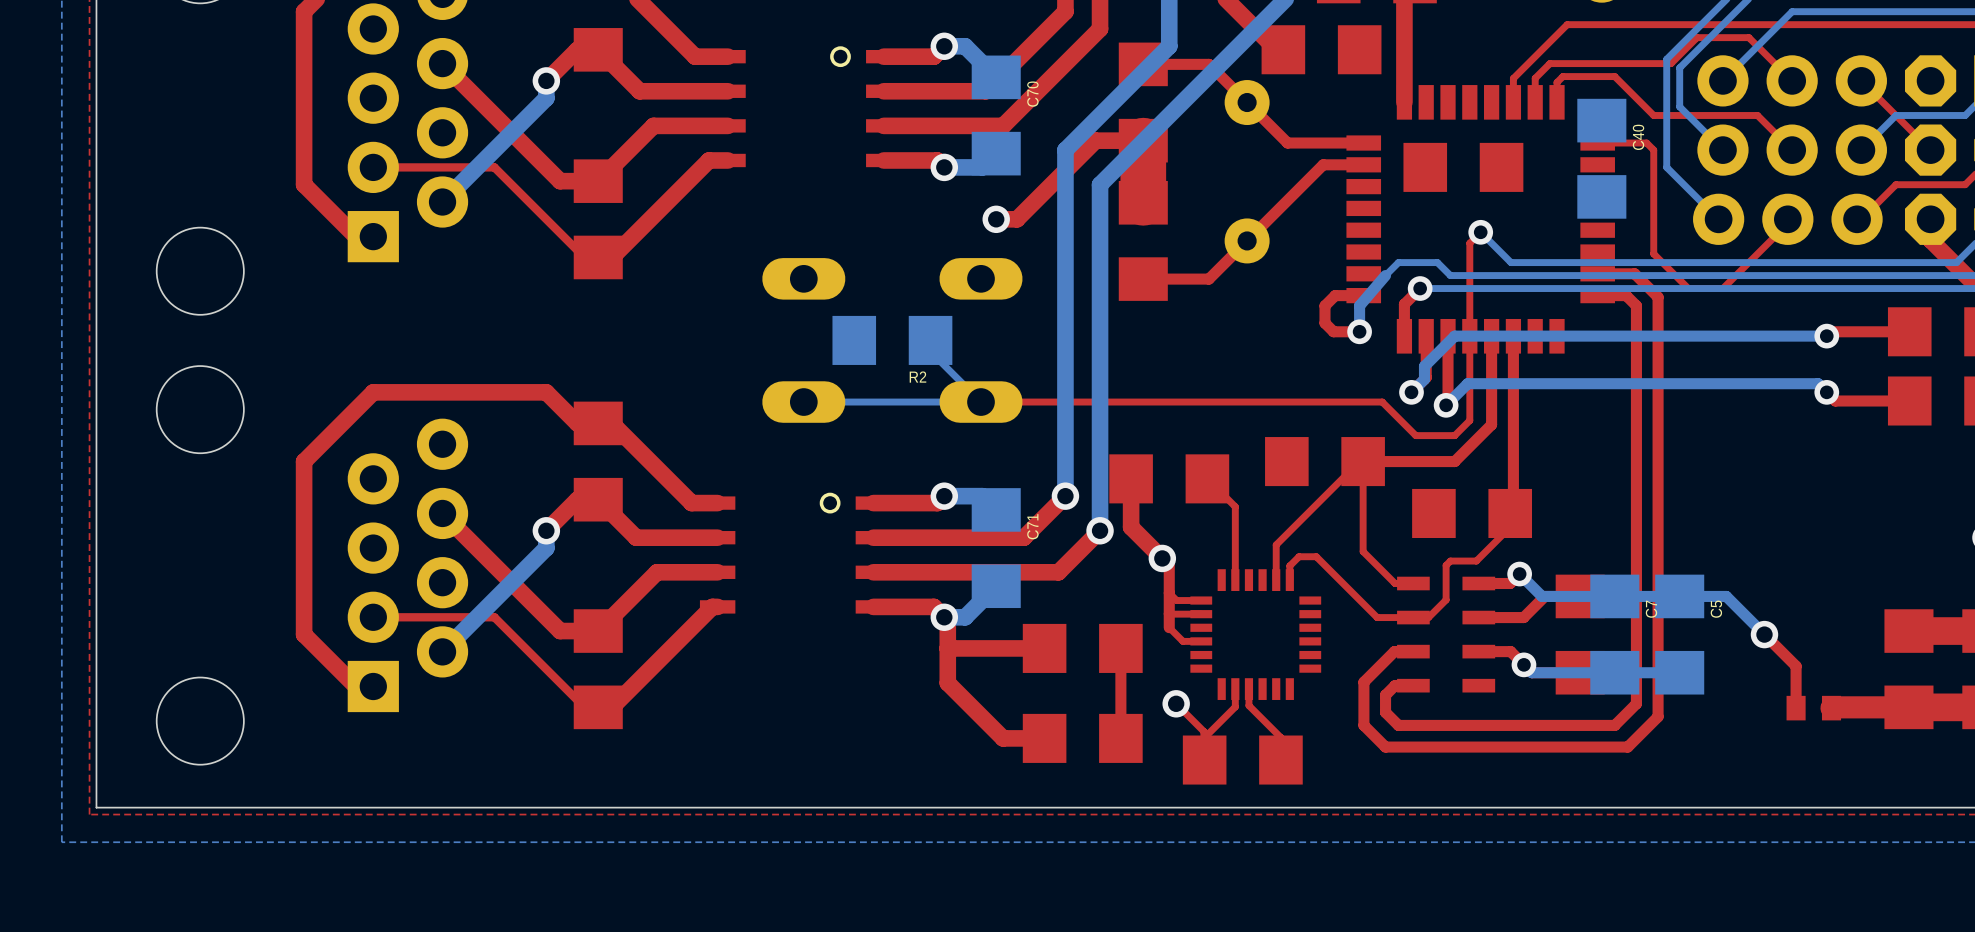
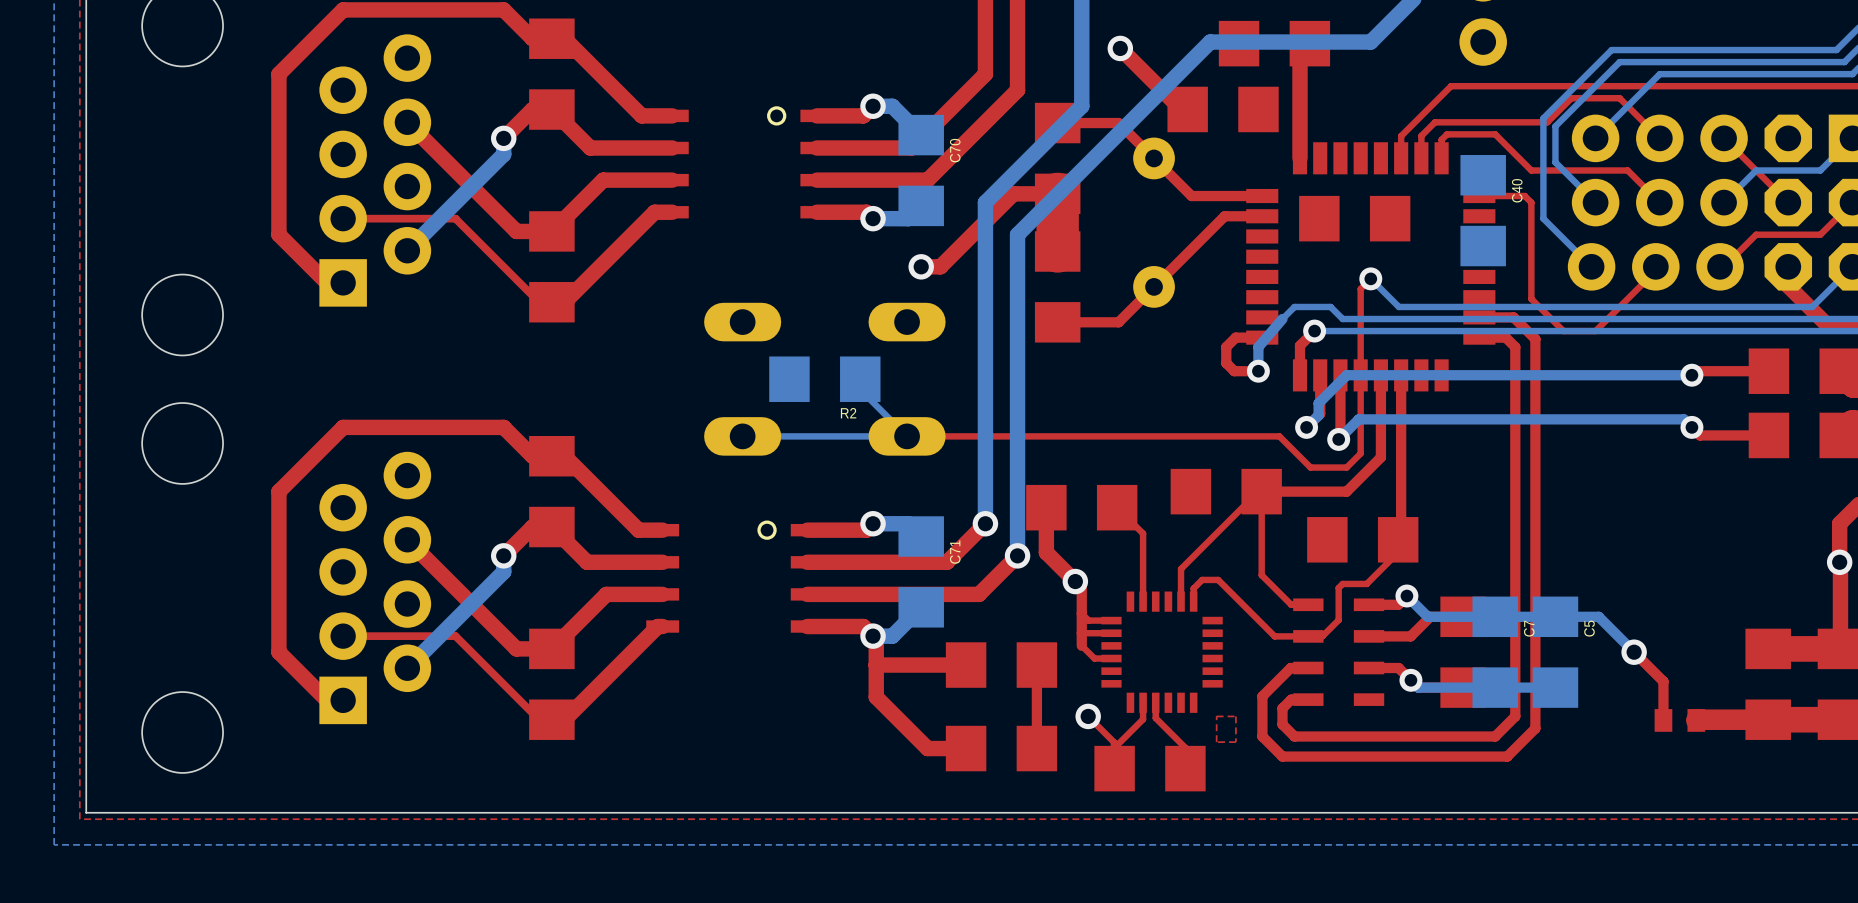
top zone outline: none -> (1235, 716) (1235, 742) (1216, 742) (1216, 716) (1235, 716)

